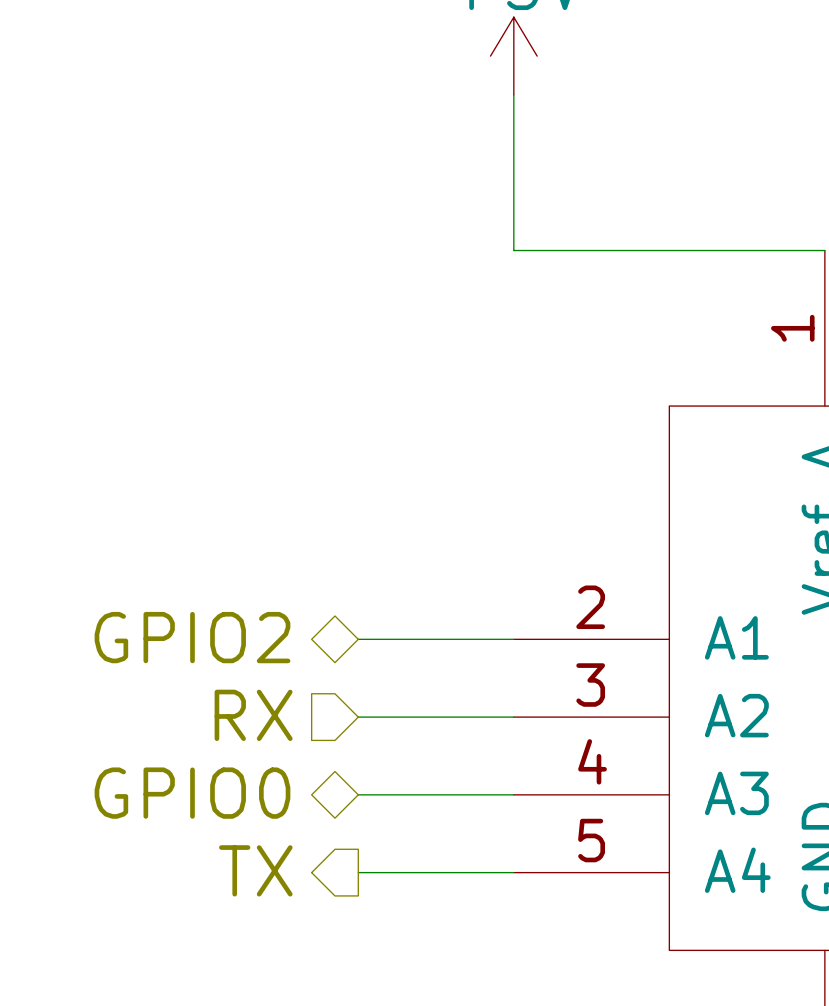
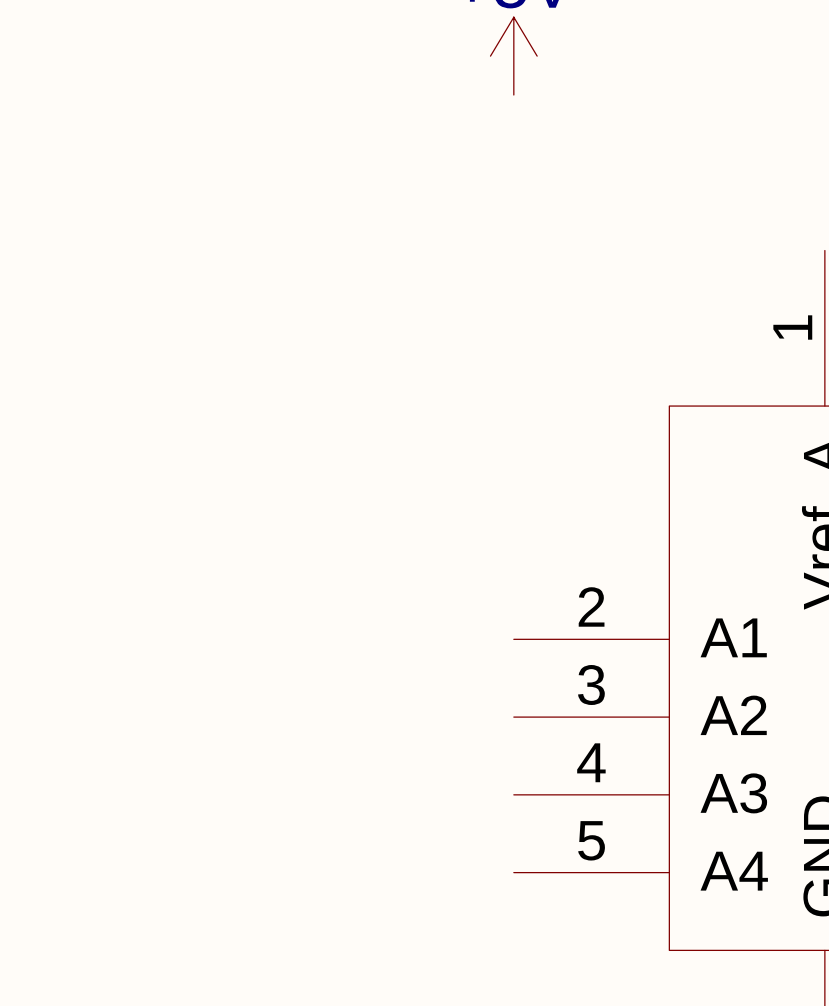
wire: (513, 95) (513, 250) (824, 250) -> none
hierarchical label: GPIO2 (192, 637) -> none
wire: (358, 639) (513, 639) -> none
hierarchical label: RX (253, 715) -> none
wire: (358, 717) (513, 717) -> none
hierarchical label: GPIO0 (192, 793) -> none
wire: (358, 794) (513, 794) -> none
hierarchical label: TX (255, 870) -> none
wire: (358, 872) (513, 872) -> none

